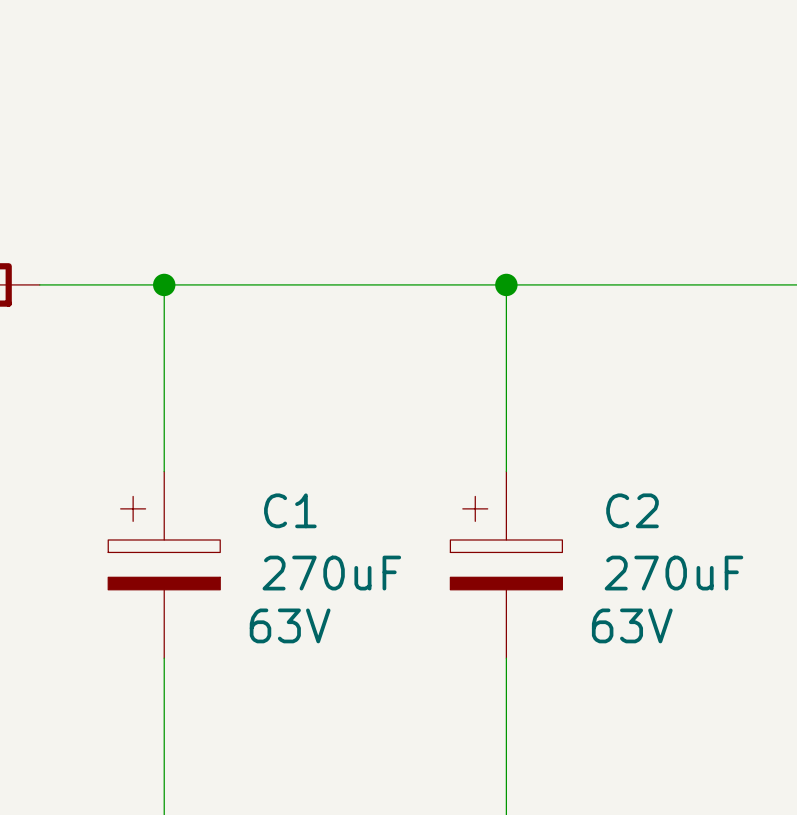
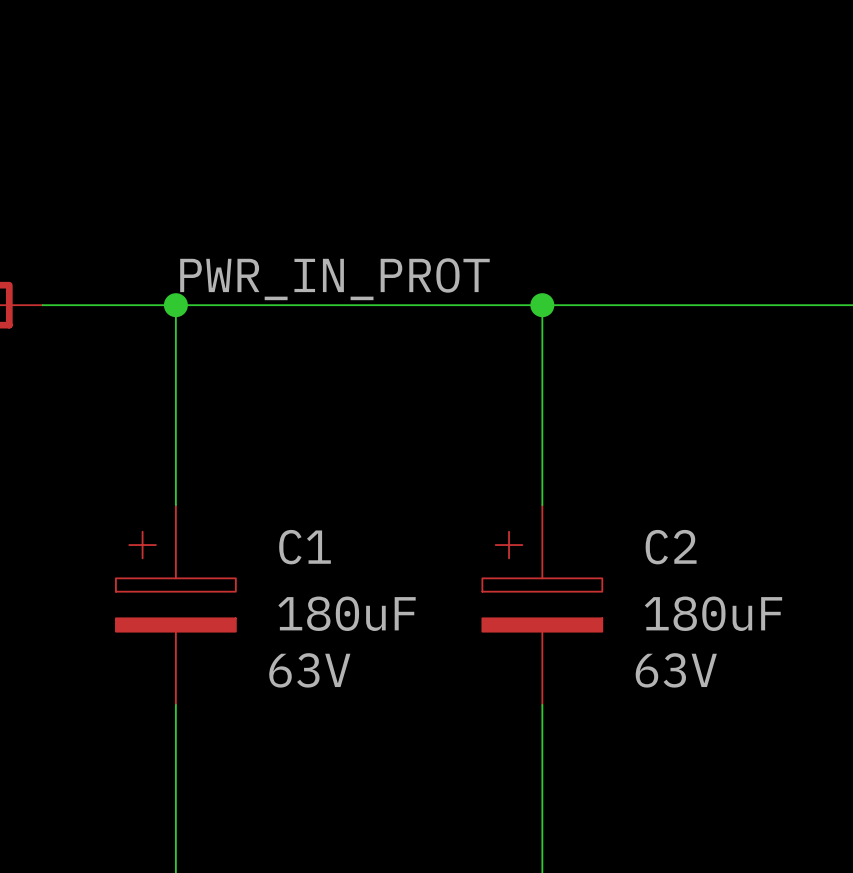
label: none -> PWR_IN_PROT (334, 279)
C1 value: 270uF (331, 573) -> 180uF (347, 613)
C2 value: 270uF (673, 573) -> 180uF (713, 613)

